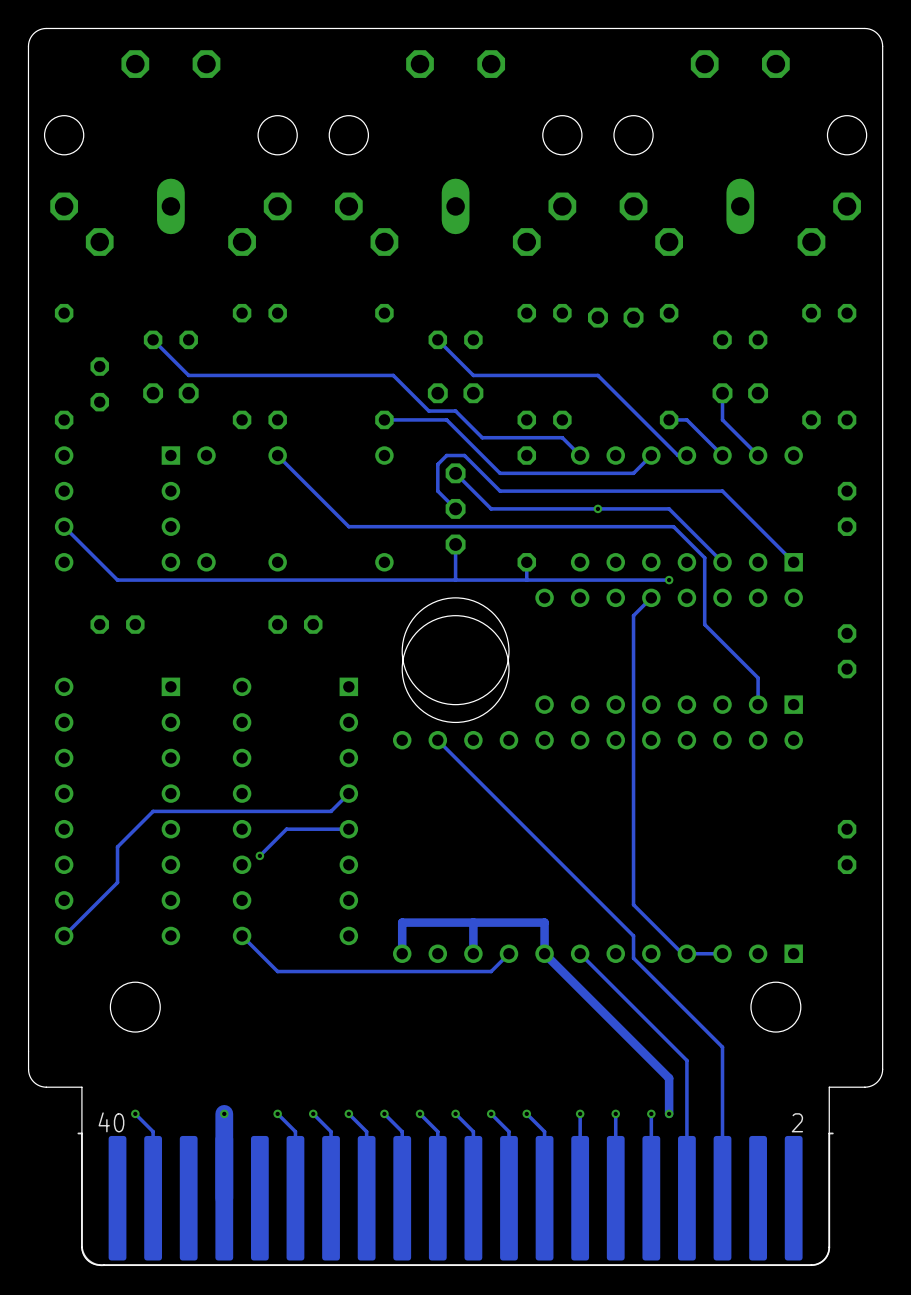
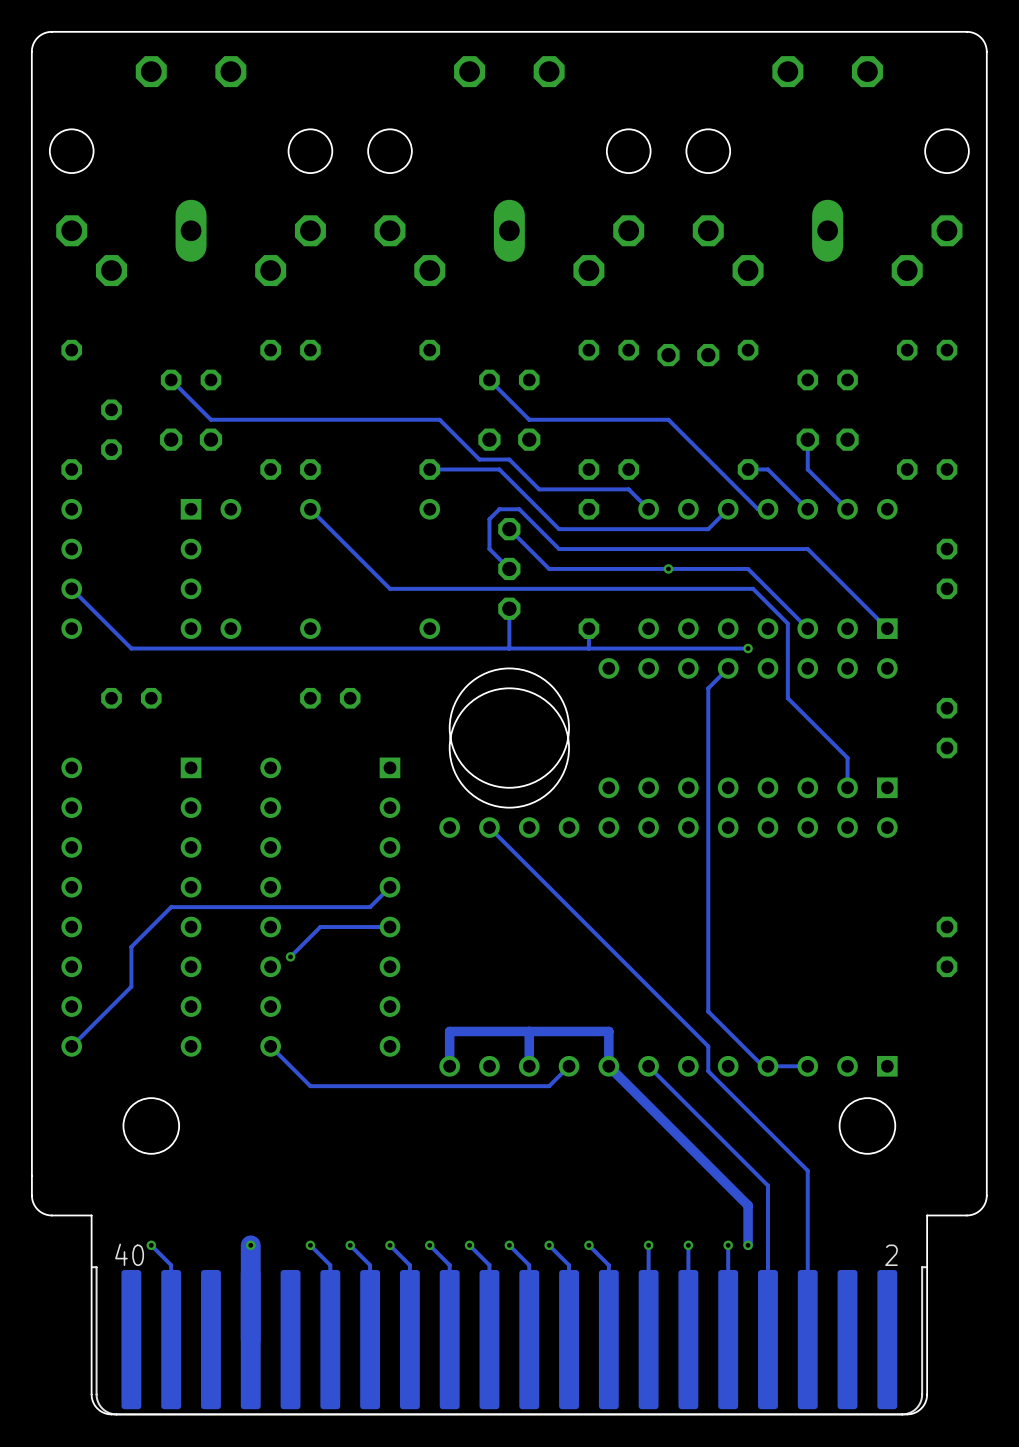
part footprint: [77, 1132, 834, 1267] -> [91, 1266, 928, 1416]

